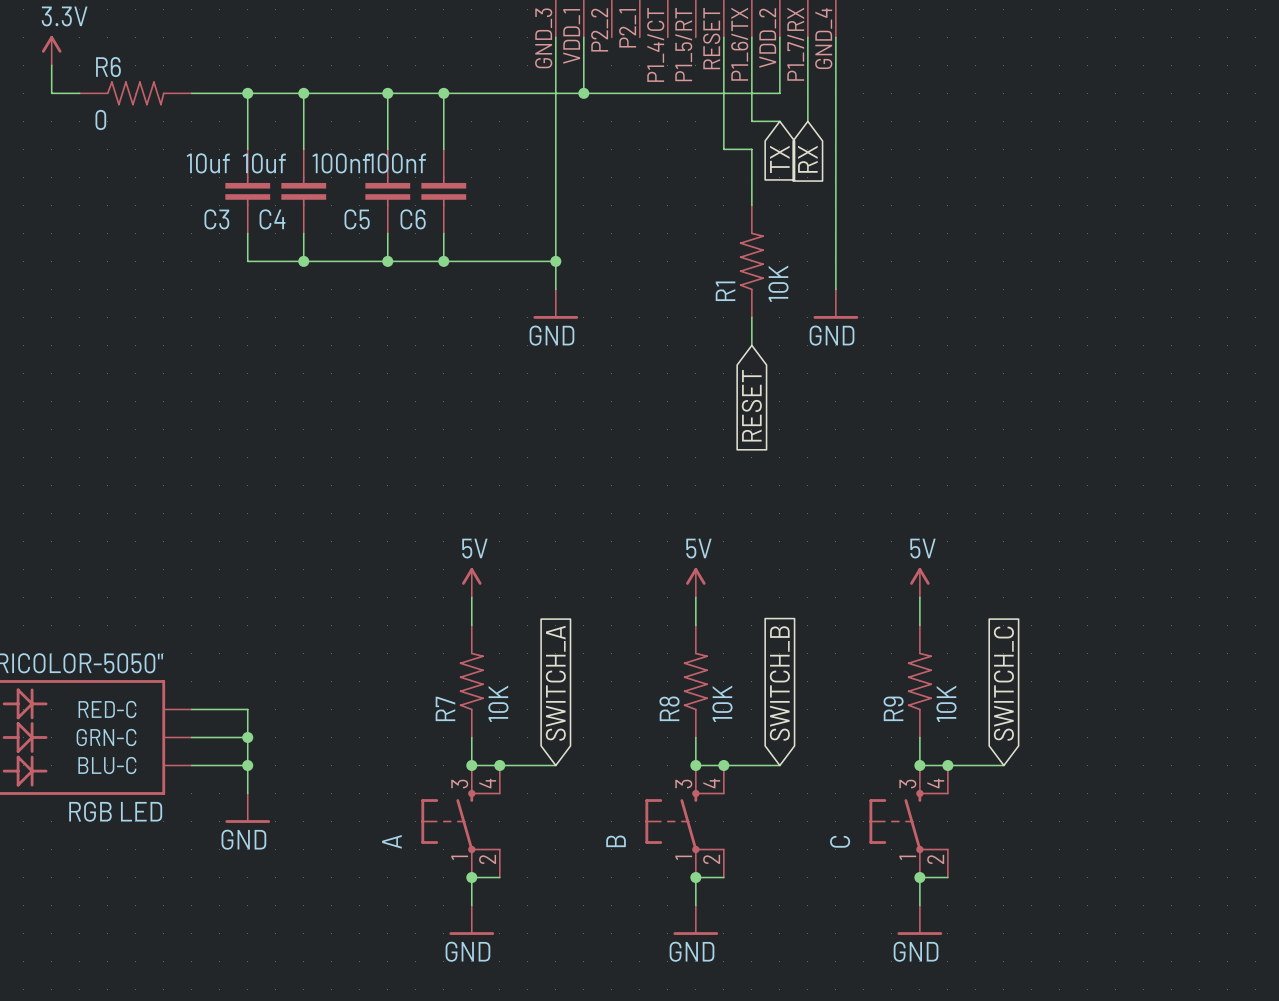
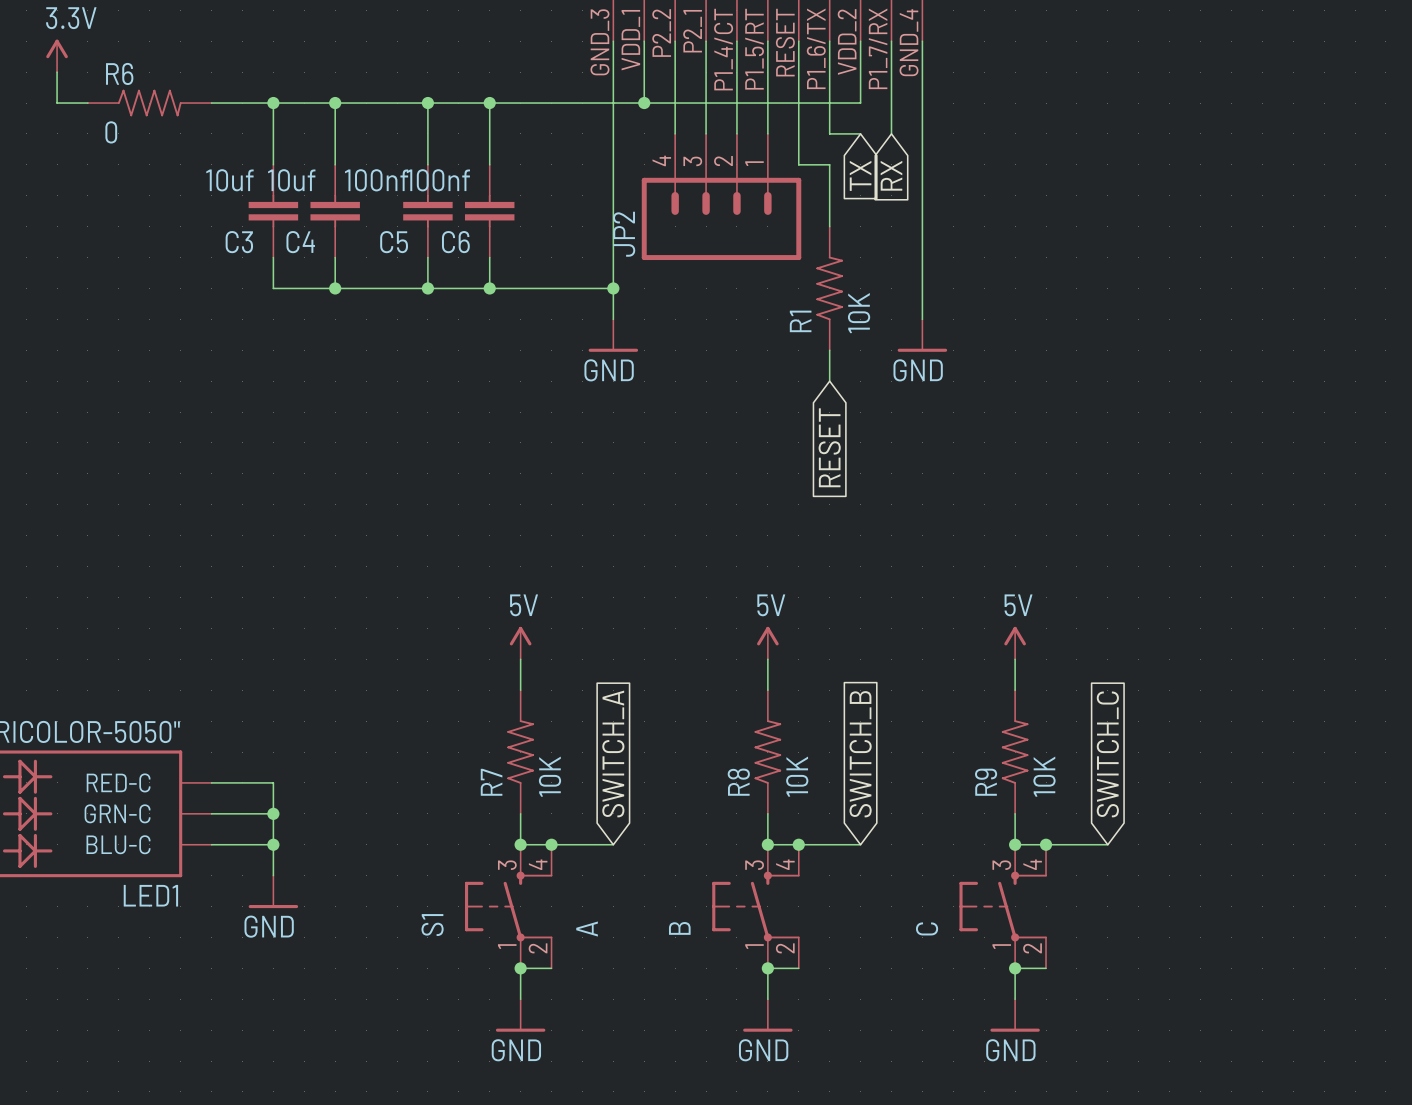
wire: none -> (675, 41) (675, 133)
wire: none -> (706, 41) (706, 133)
wire: none -> (736, 41) (736, 133)
wire: none -> (767, 41) (767, 133)
JP2: none -> (721, 196)
RGB LED name: RGB LED (115, 811) -> LED1 (150, 895)
A name: A (391, 841) -> S1 (432, 925)
A value: none -> A (587, 929)

